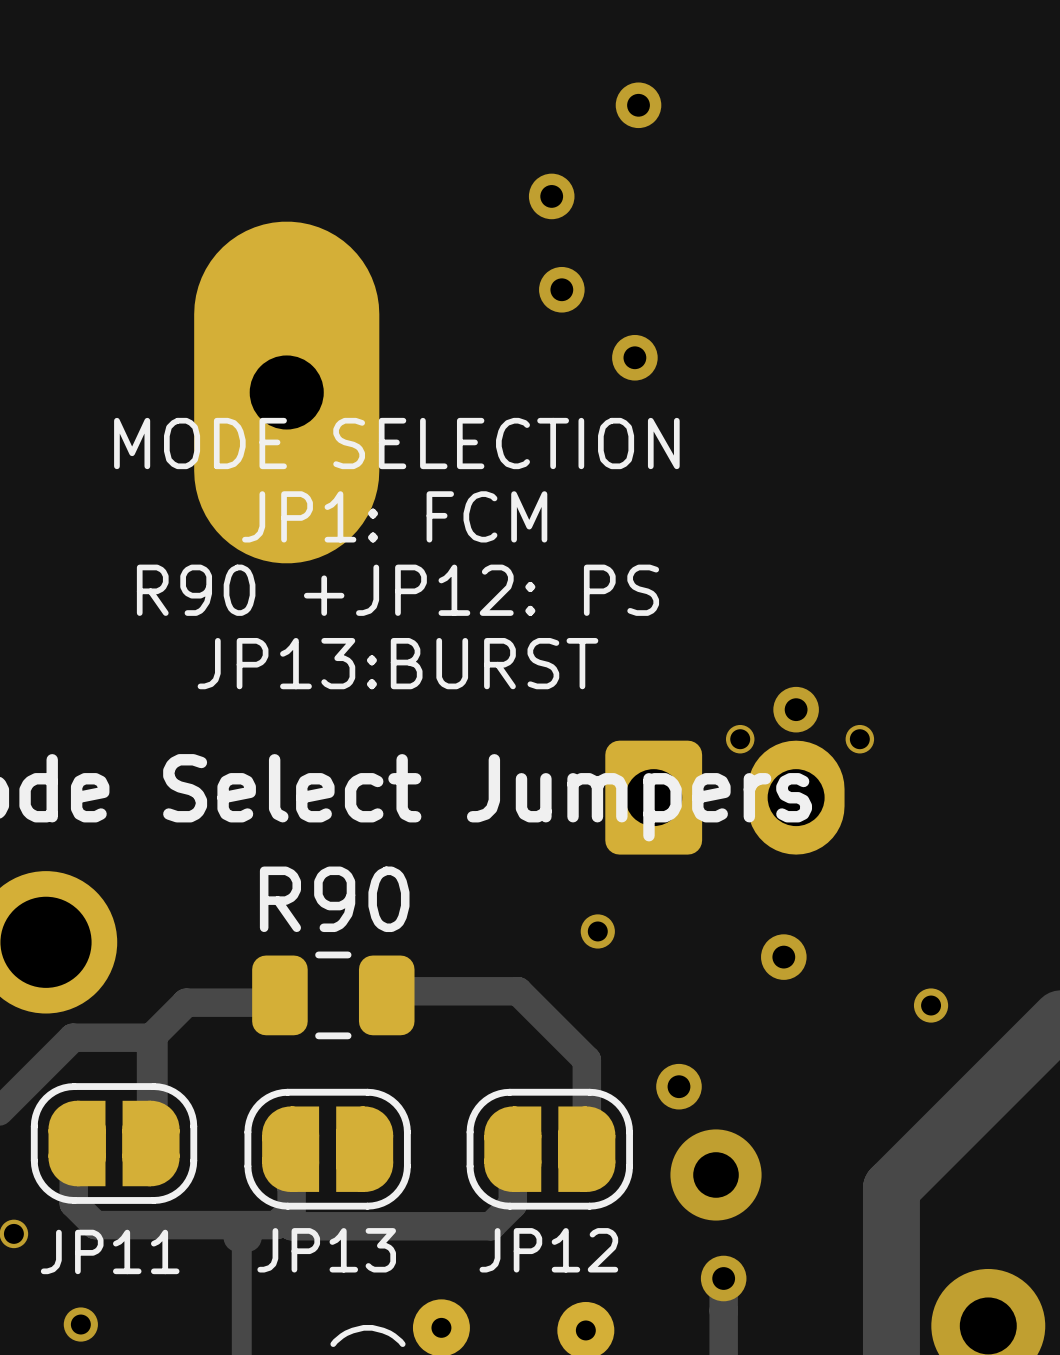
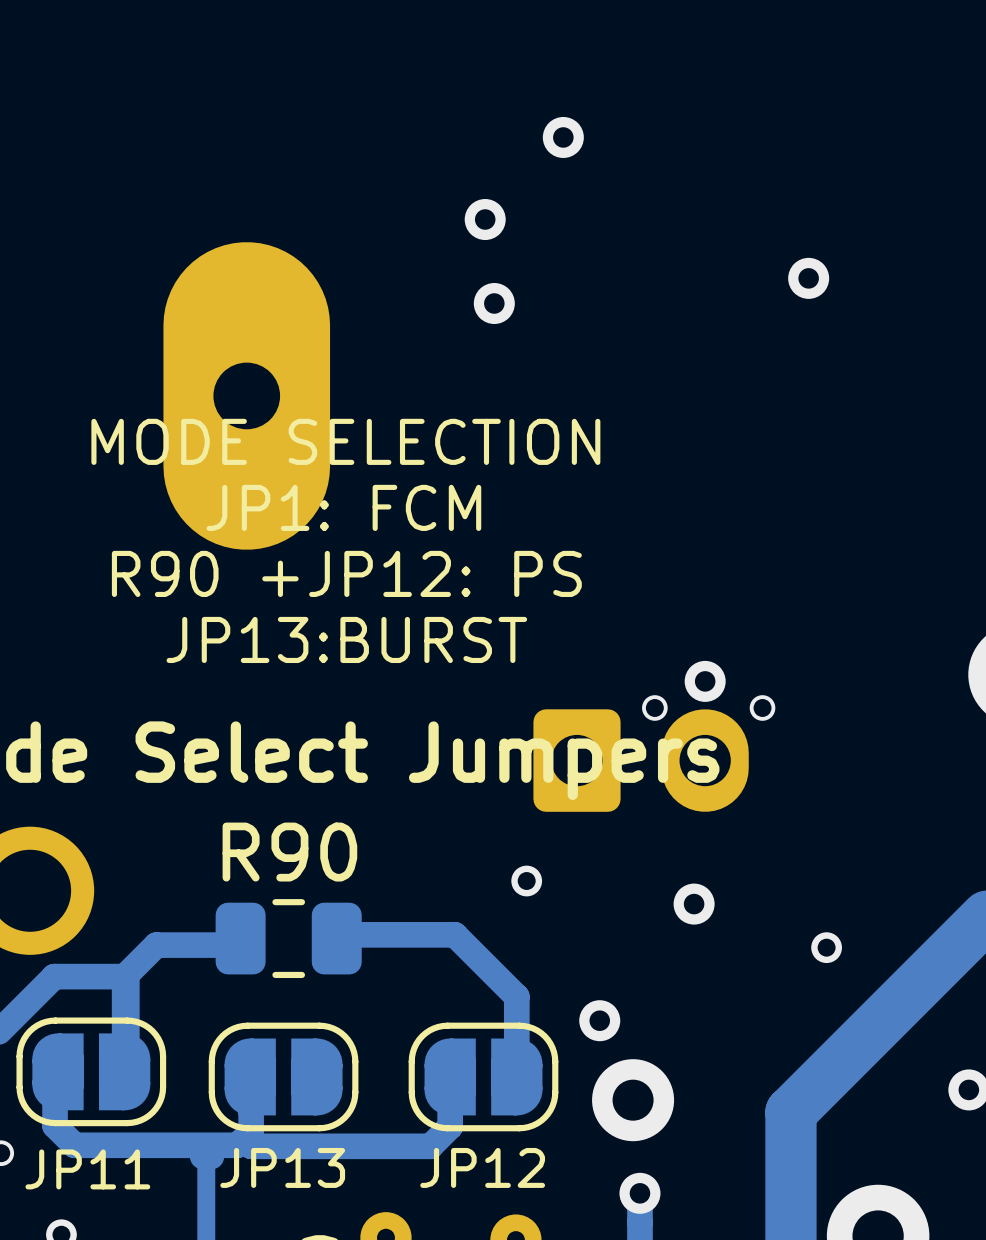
via position: (634, 357) -> (808, 278)

